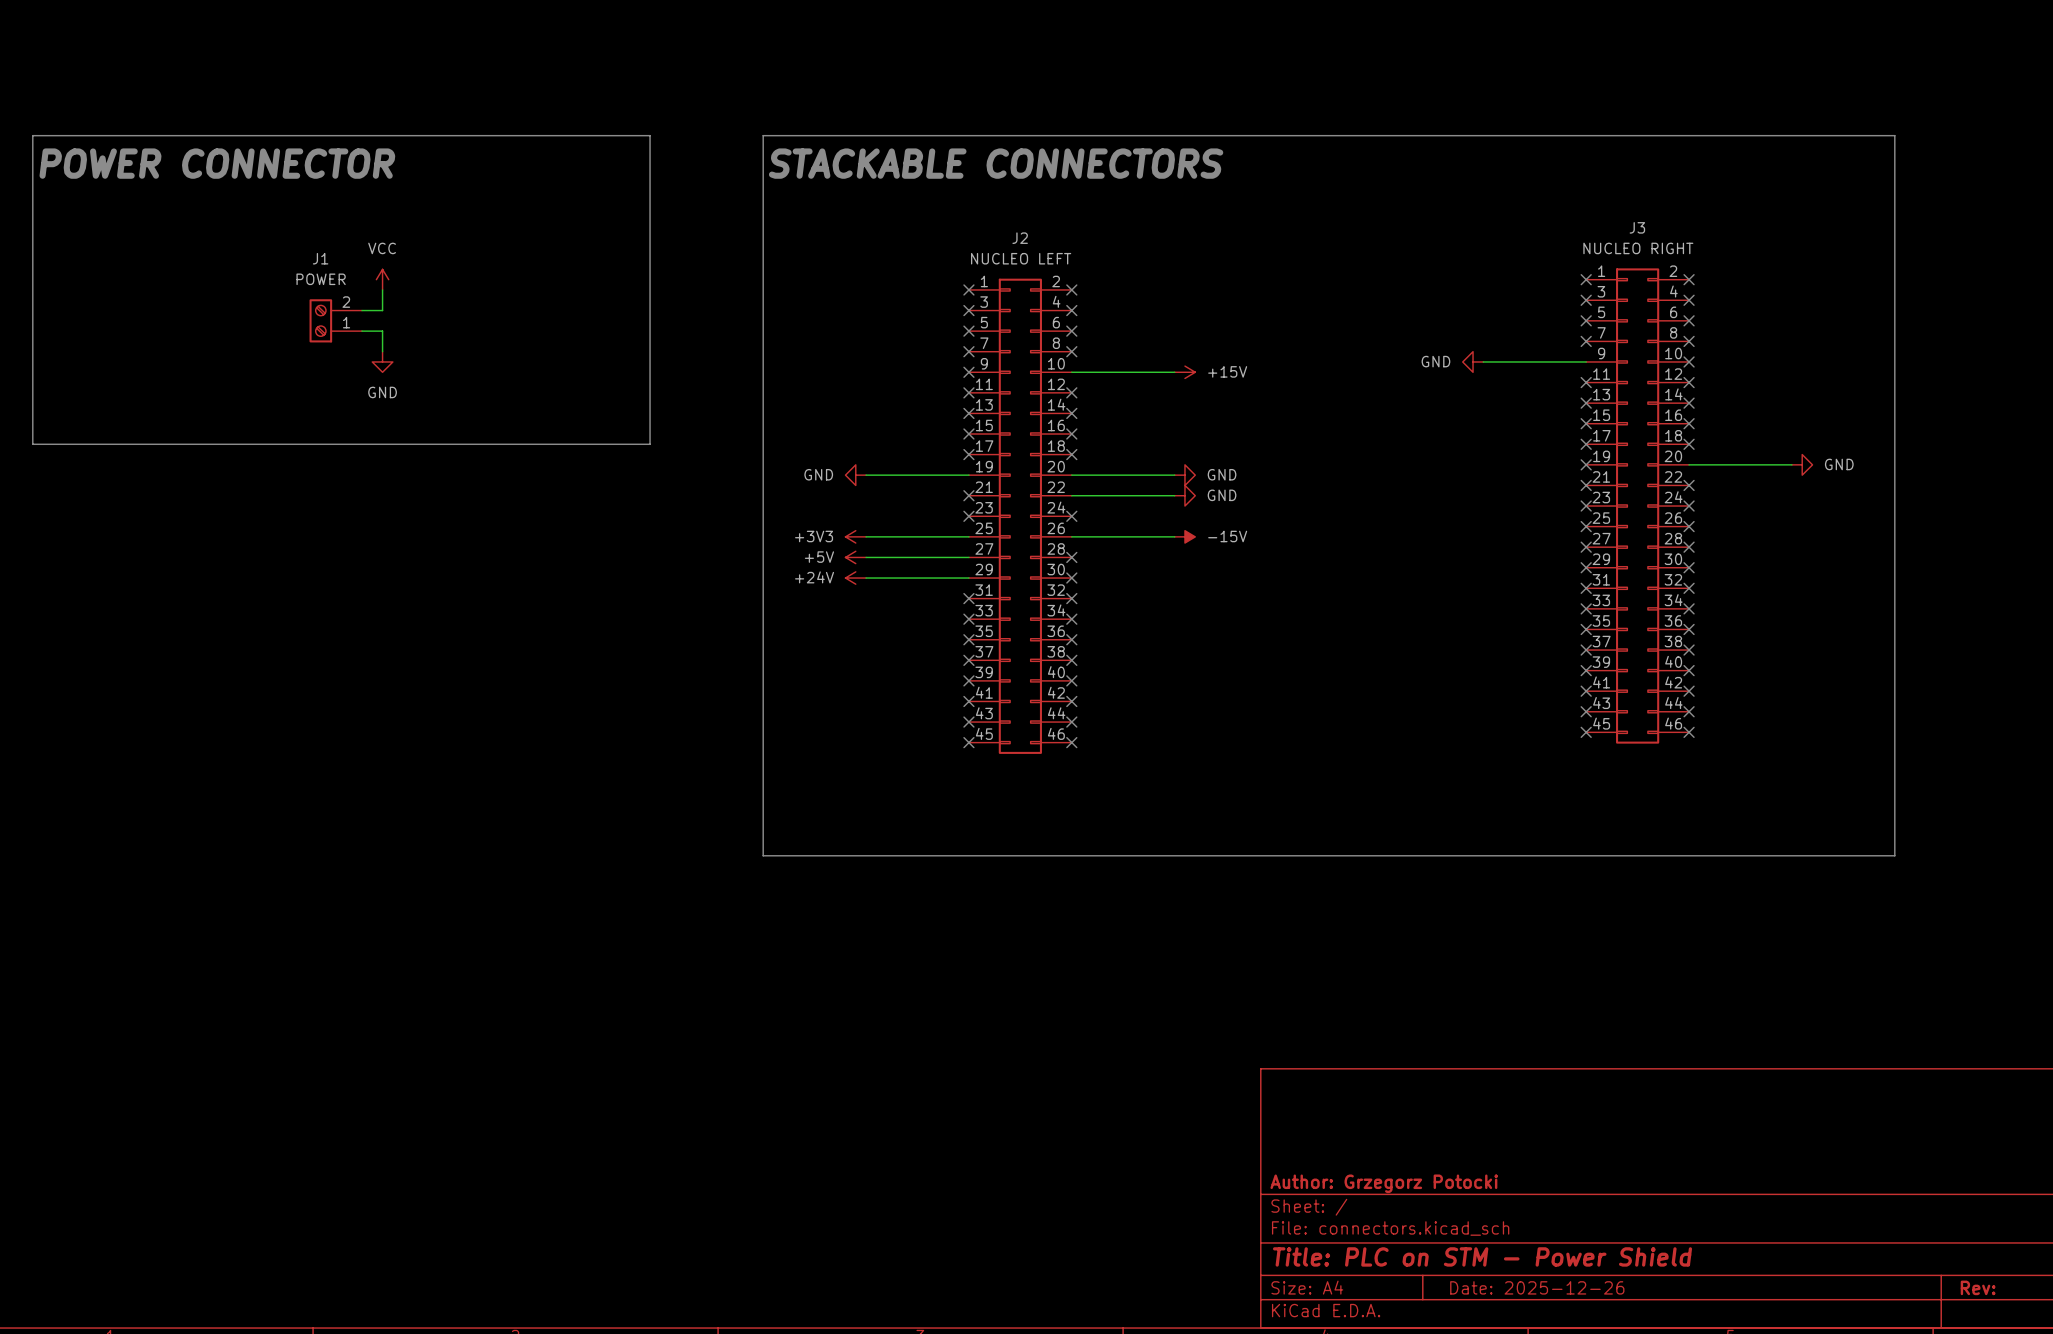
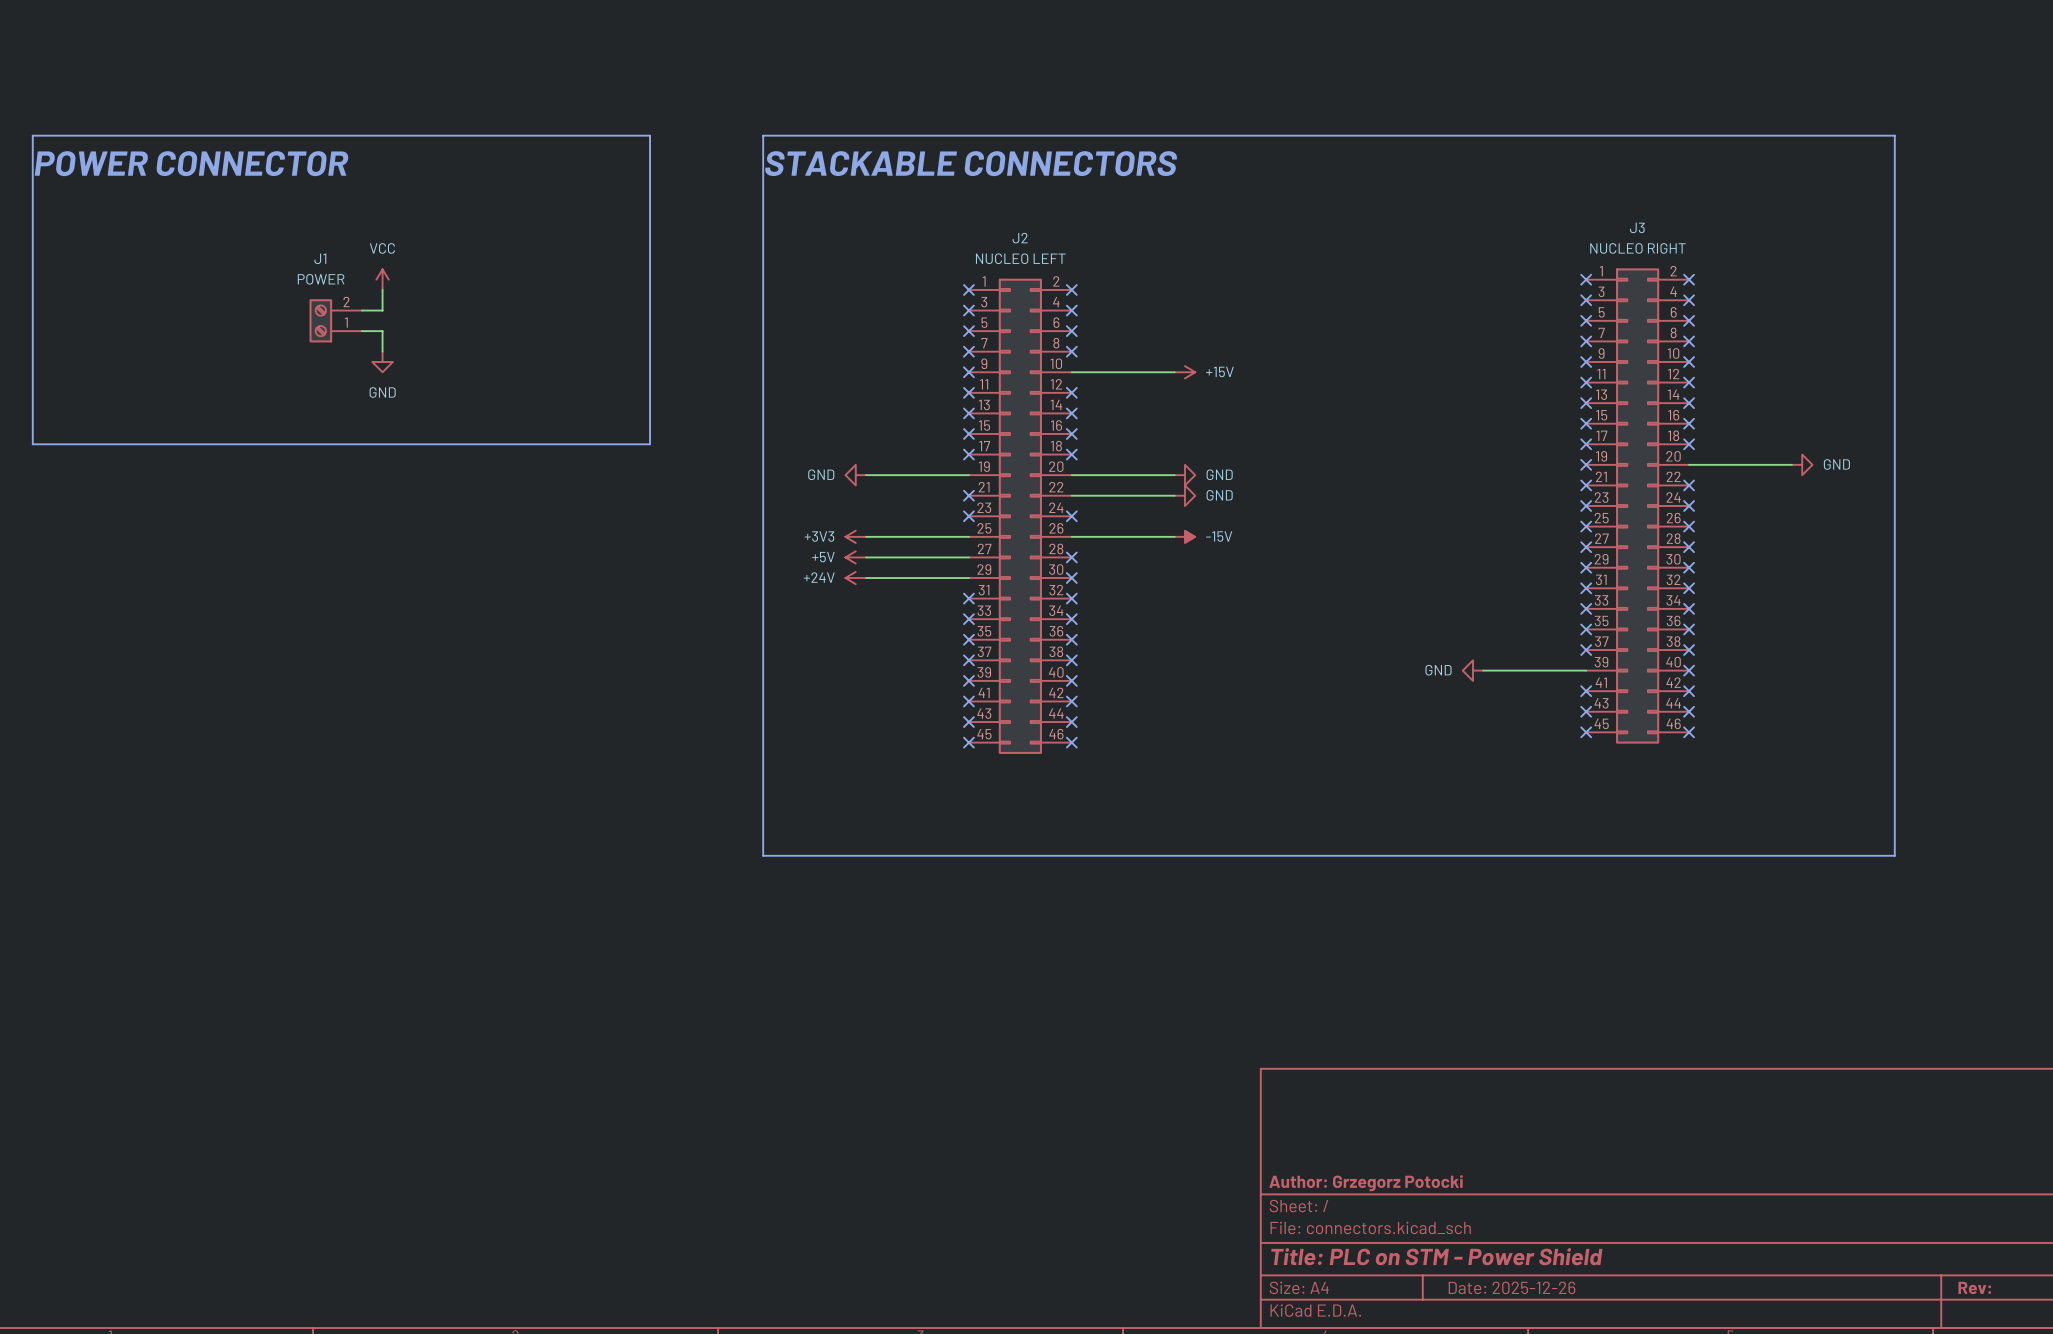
power symbol: GND (1473, 361) -> none
wire: (1483, 361) (1586, 361) -> none
no-connect mark: none -> (1586, 361)
power symbol: none -> GND (1473, 670)
wire: none -> (1483, 670) (1586, 670)
no-connect mark: (1586, 670) -> none

